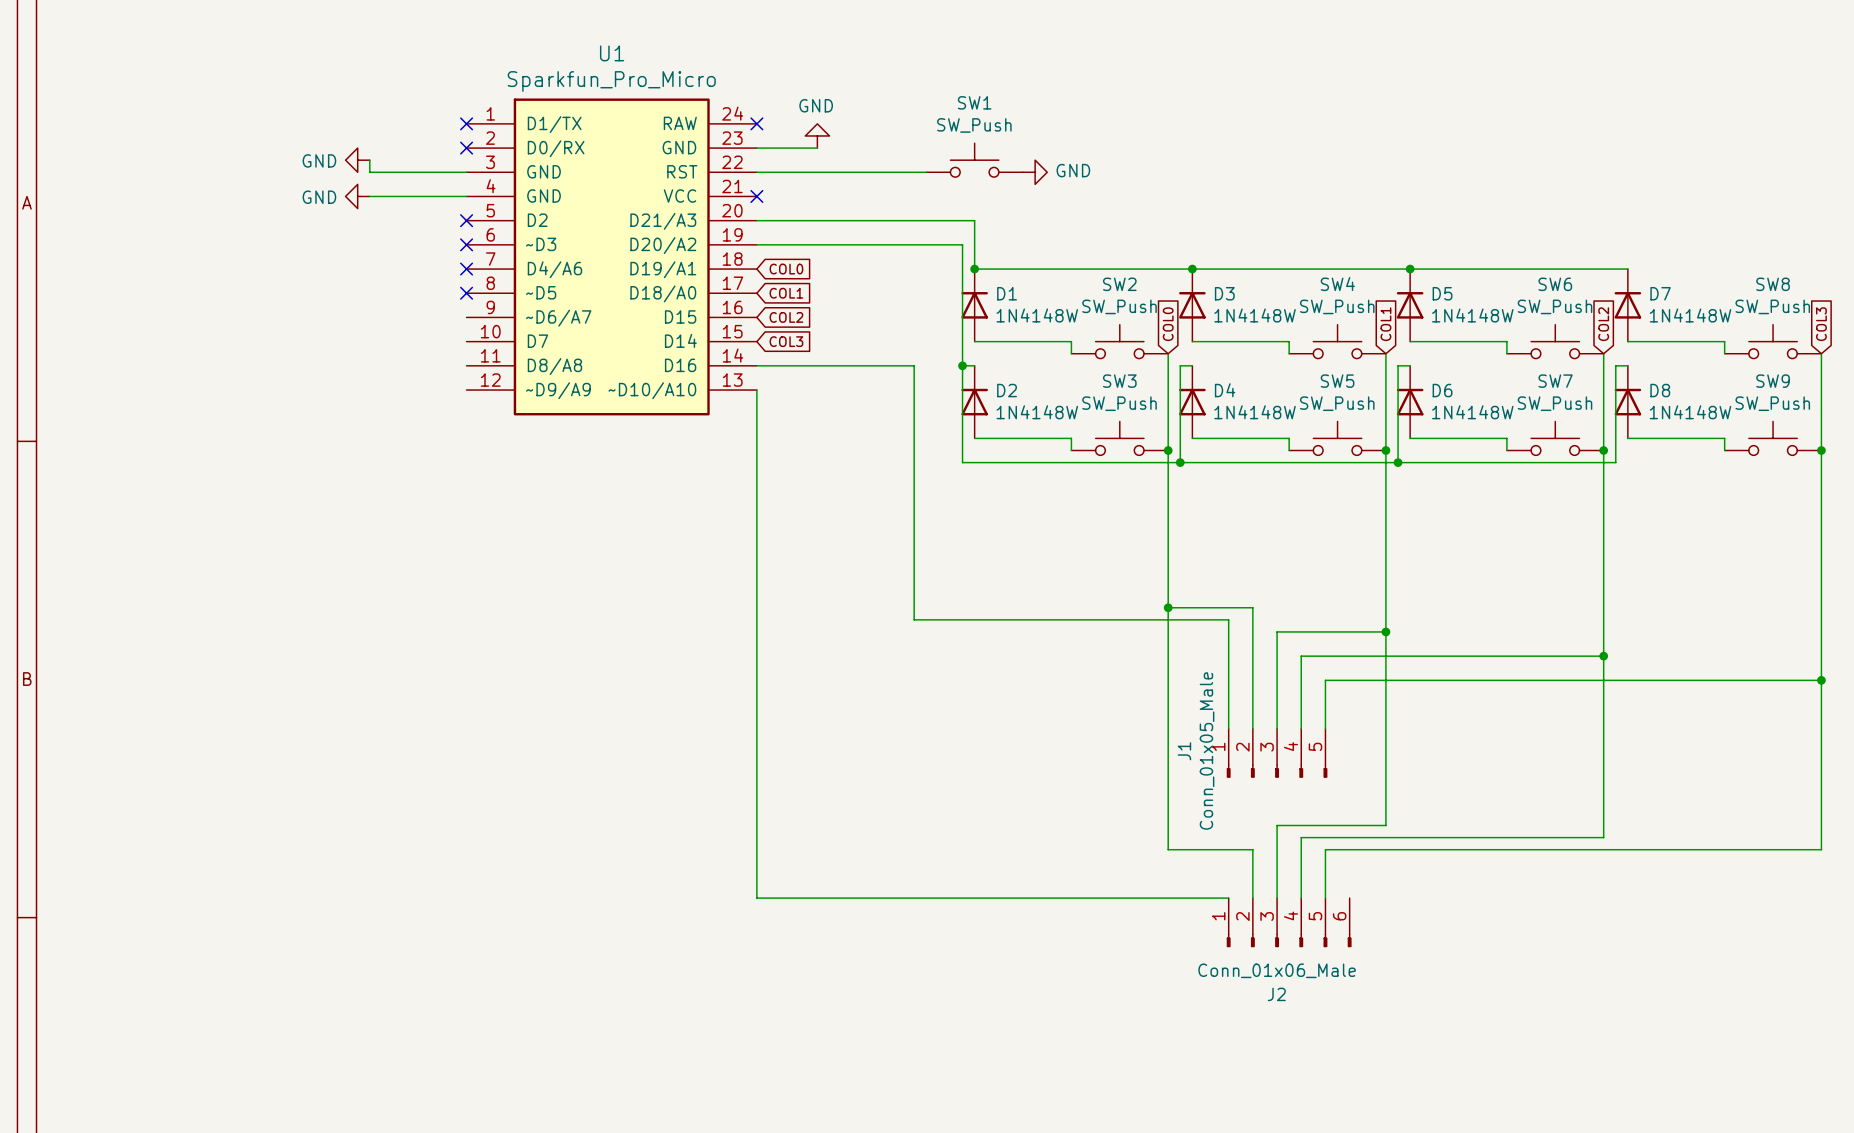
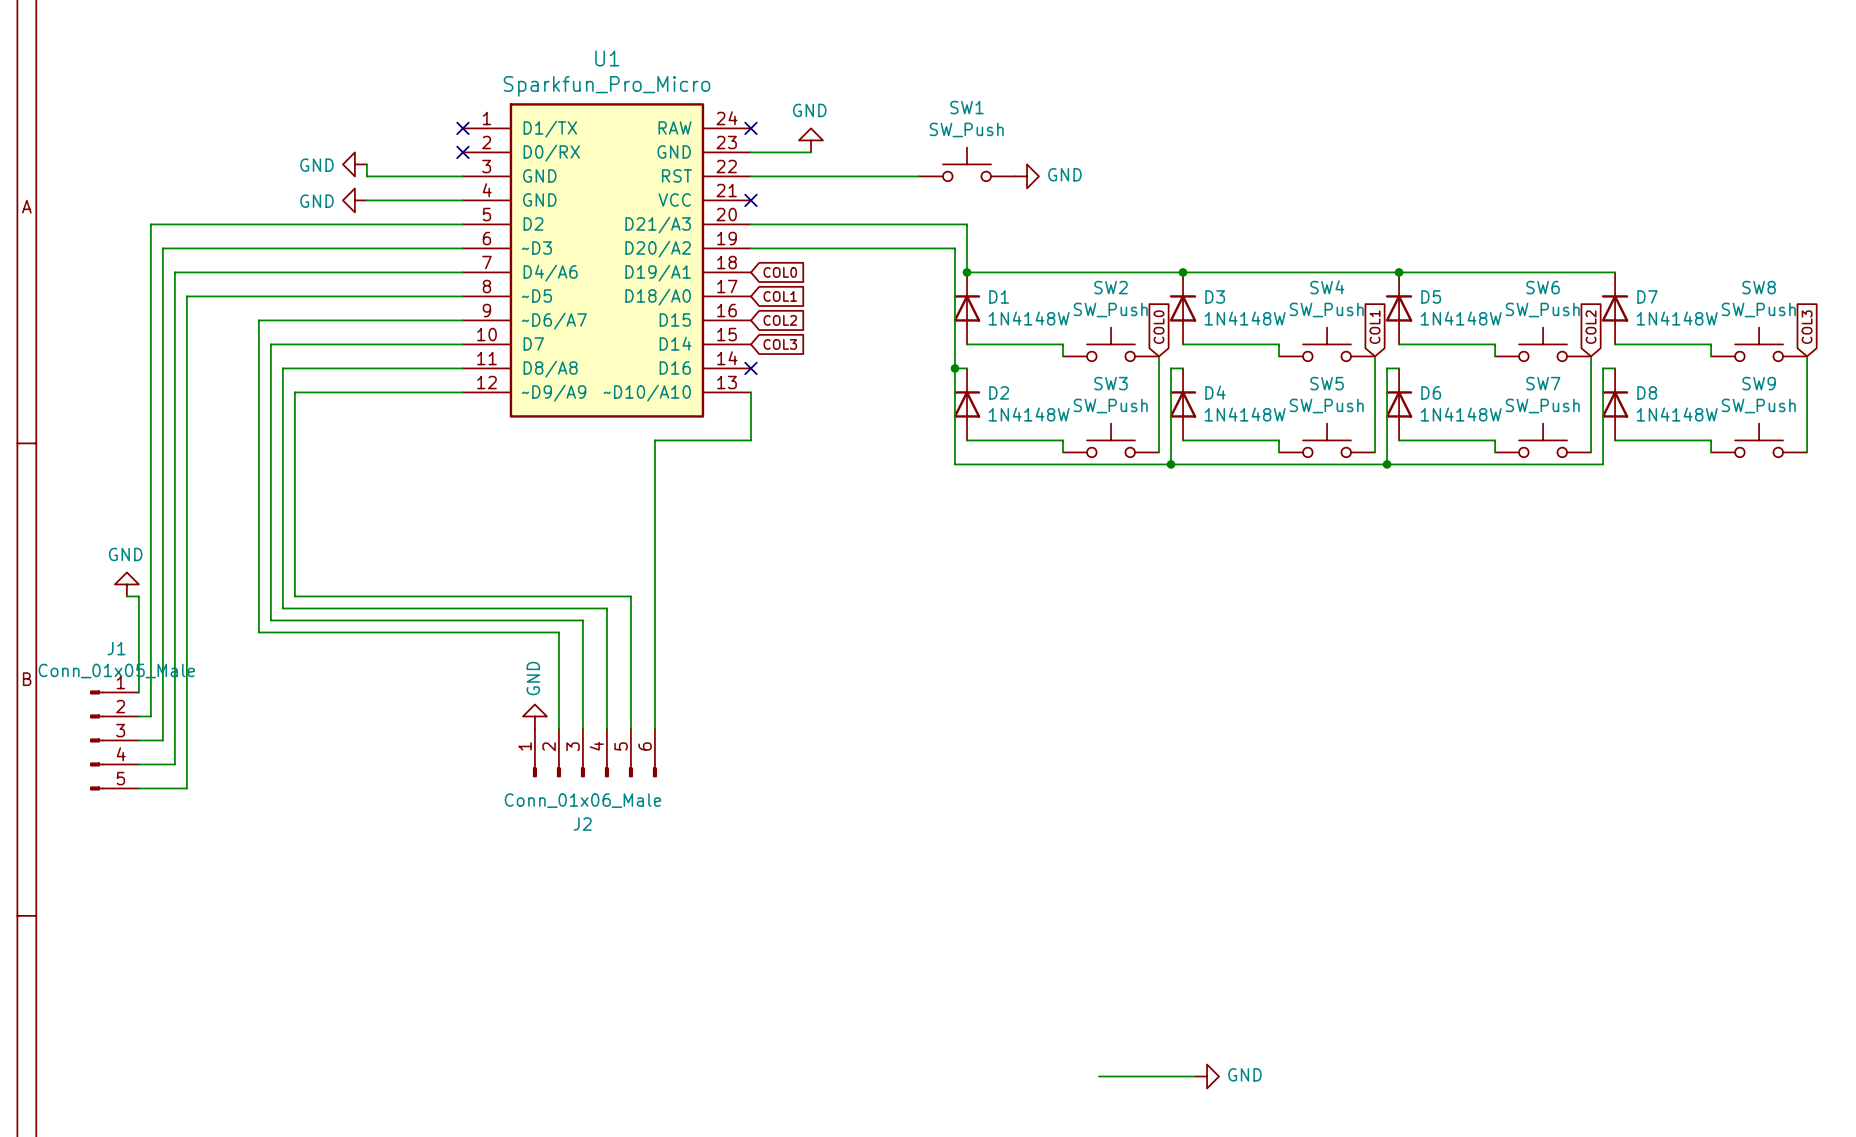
wire: none -> (462, 224) (150, 224) (150, 716) (138, 716)
no-connect mark: (466, 220) -> none
wire: none -> (462, 248) (162, 248) (162, 740) (138, 740)
no-connect mark: (466, 244) -> none
wire: none -> (462, 272) (174, 272) (174, 764) (138, 764)
no-connect mark: (466, 269) -> none
wire: none -> (462, 296) (186, 296) (186, 788) (138, 788)
no-connect mark: (466, 293) -> none
wire: none -> (462, 320) (258, 320) (258, 632) (558, 632) (558, 728)
wire: none -> (462, 344) (270, 344) (270, 620) (582, 620) (582, 728)
wire: none -> (462, 368) (282, 368) (282, 608) (606, 608) (606, 728)
wire: (756, 365) (914, 365) (914, 619) (1228, 619) (1228, 728) -> none
no-connect mark: none -> (750, 368)
wire: none -> (462, 392) (294, 392) (294, 596) (630, 596) (630, 728)
wire: (756, 438) (756, 898) (1228, 898) -> (750, 440) (654, 440) (654, 728)
wire: (1168, 450) (1168, 849) (1252, 849) (1252, 898) -> none
junction: (1168, 450) -> none
wire: (1385, 450) (1385, 825) (1277, 825) (1277, 898) -> none
junction: (1385, 450) -> none
wire: (1603, 450) (1603, 837) (1301, 837) (1301, 898) -> none
junction: (1603, 450) -> none
wire: (1821, 450) (1821, 849) (1325, 849) (1325, 898) -> none
junction: (1821, 450) -> none
power symbol: none -> GND (126, 584)
wire: none -> (126, 596) (138, 596) (138, 692)
wire: (1168, 607) (1252, 607) (1252, 728) -> none
junction: (1168, 607) -> none
wire: (1385, 631) (1277, 631) (1277, 728) -> none
junction: (1385, 631) -> none
wire: (1603, 656) (1301, 656) (1301, 728) -> none
junction: (1603, 656) -> none
wire: (1821, 680) (1325, 680) (1325, 728) -> none
junction: (1821, 680) -> none
power symbol: none -> GND (534, 716)
J1 position: (1277, 753) -> (114, 740)
J1 rotation: 0° (1277, 771) -> 90° clockwise (96, 740)
J2 position: (1289, 922) -> (594, 752)
wire: none -> (1099, 1076) (1195, 1076)
power symbol: none -> GND (1207, 1076)

